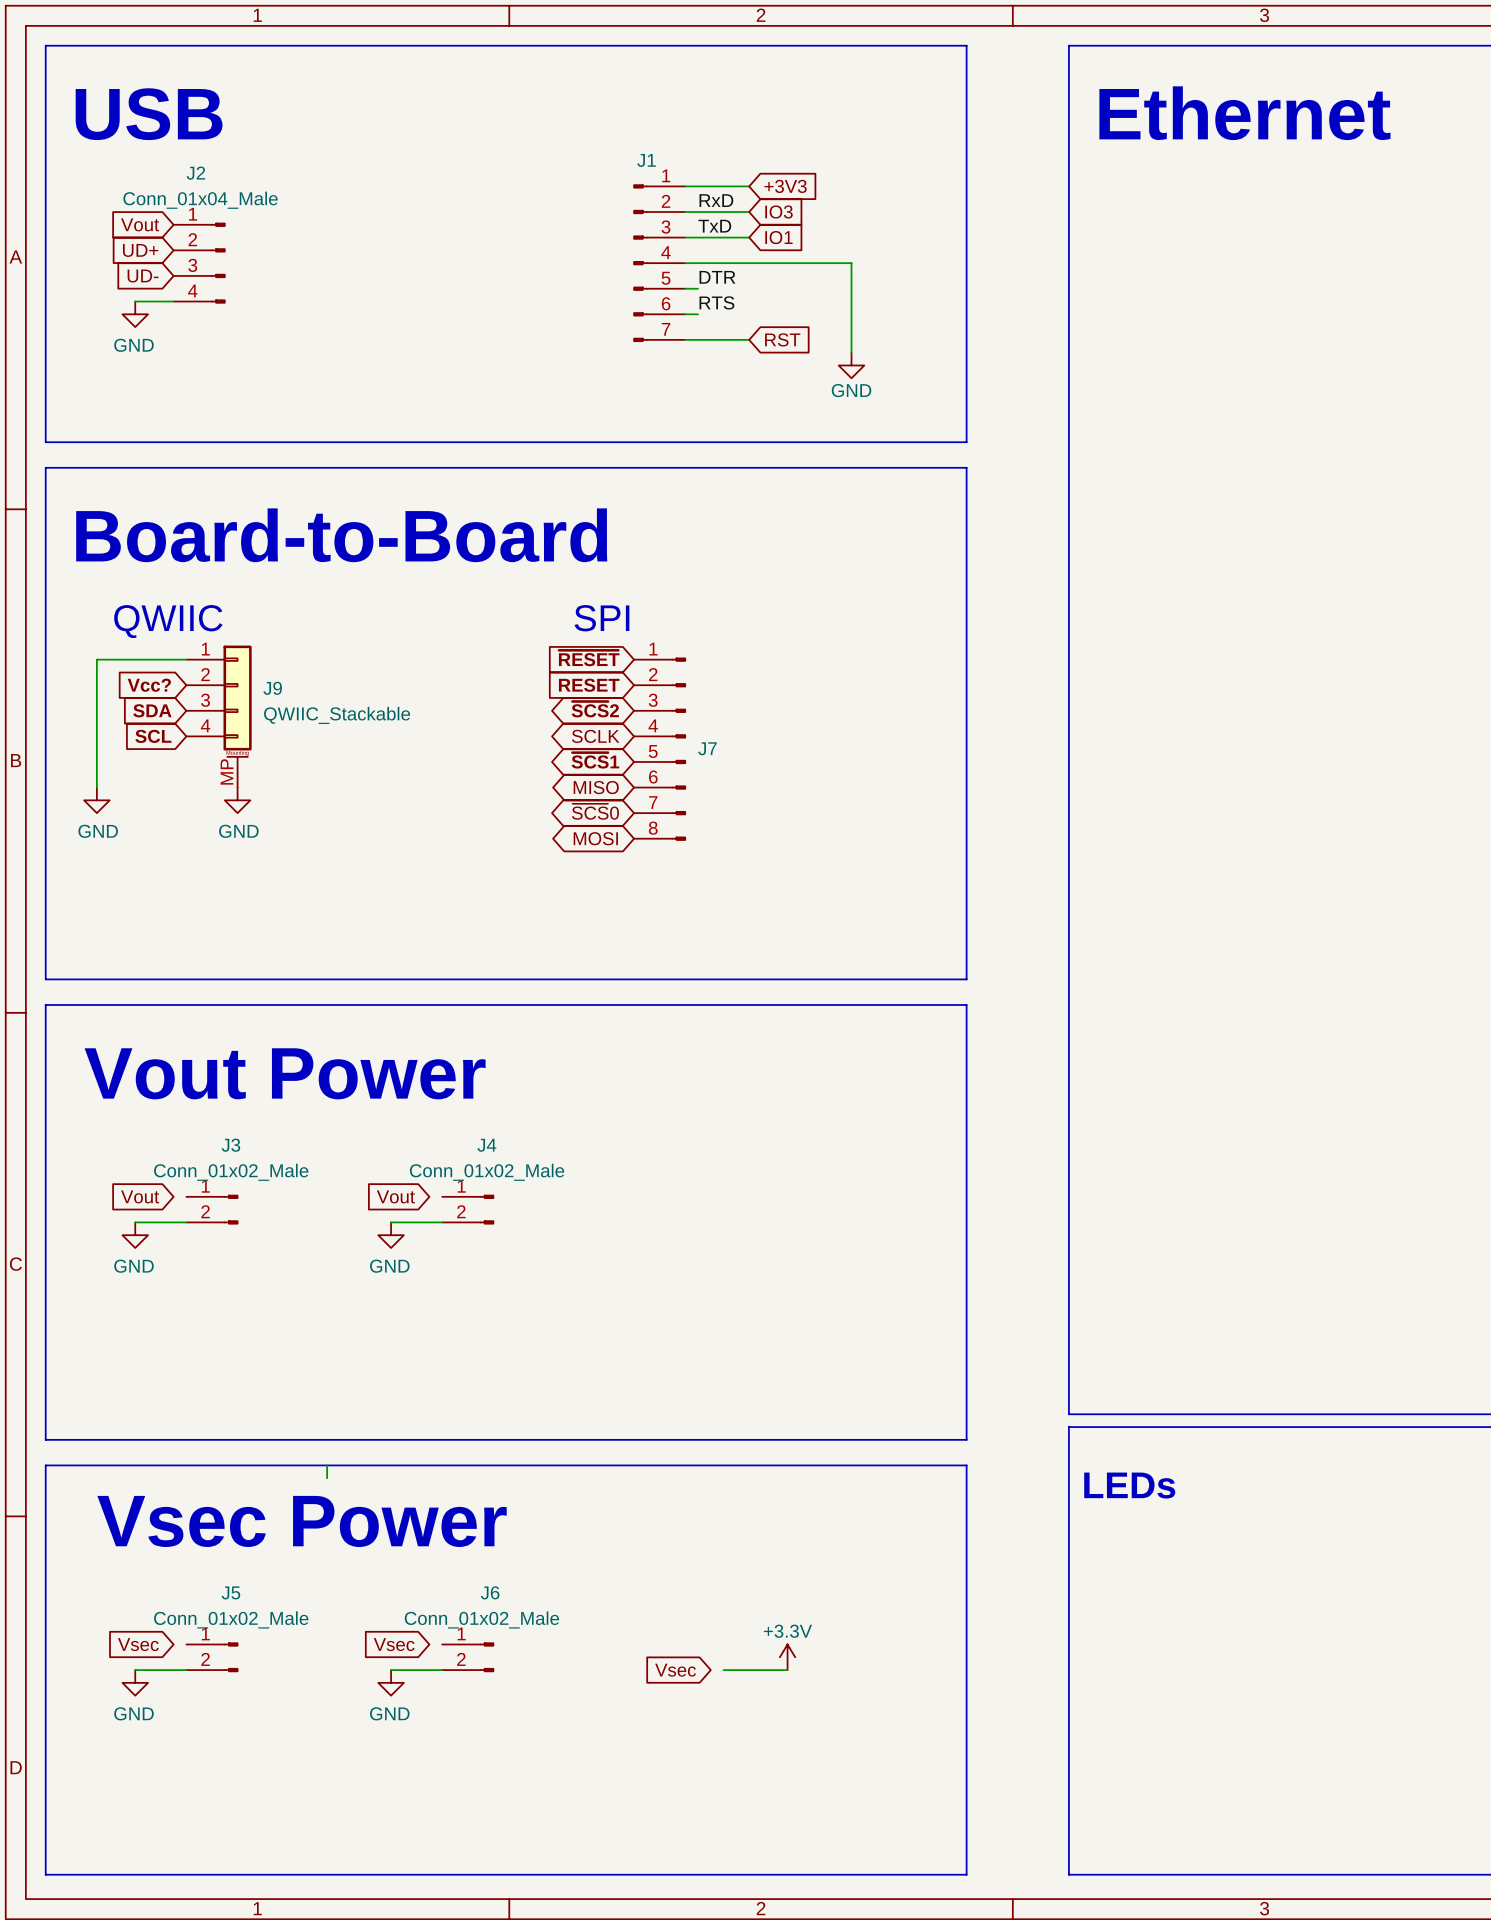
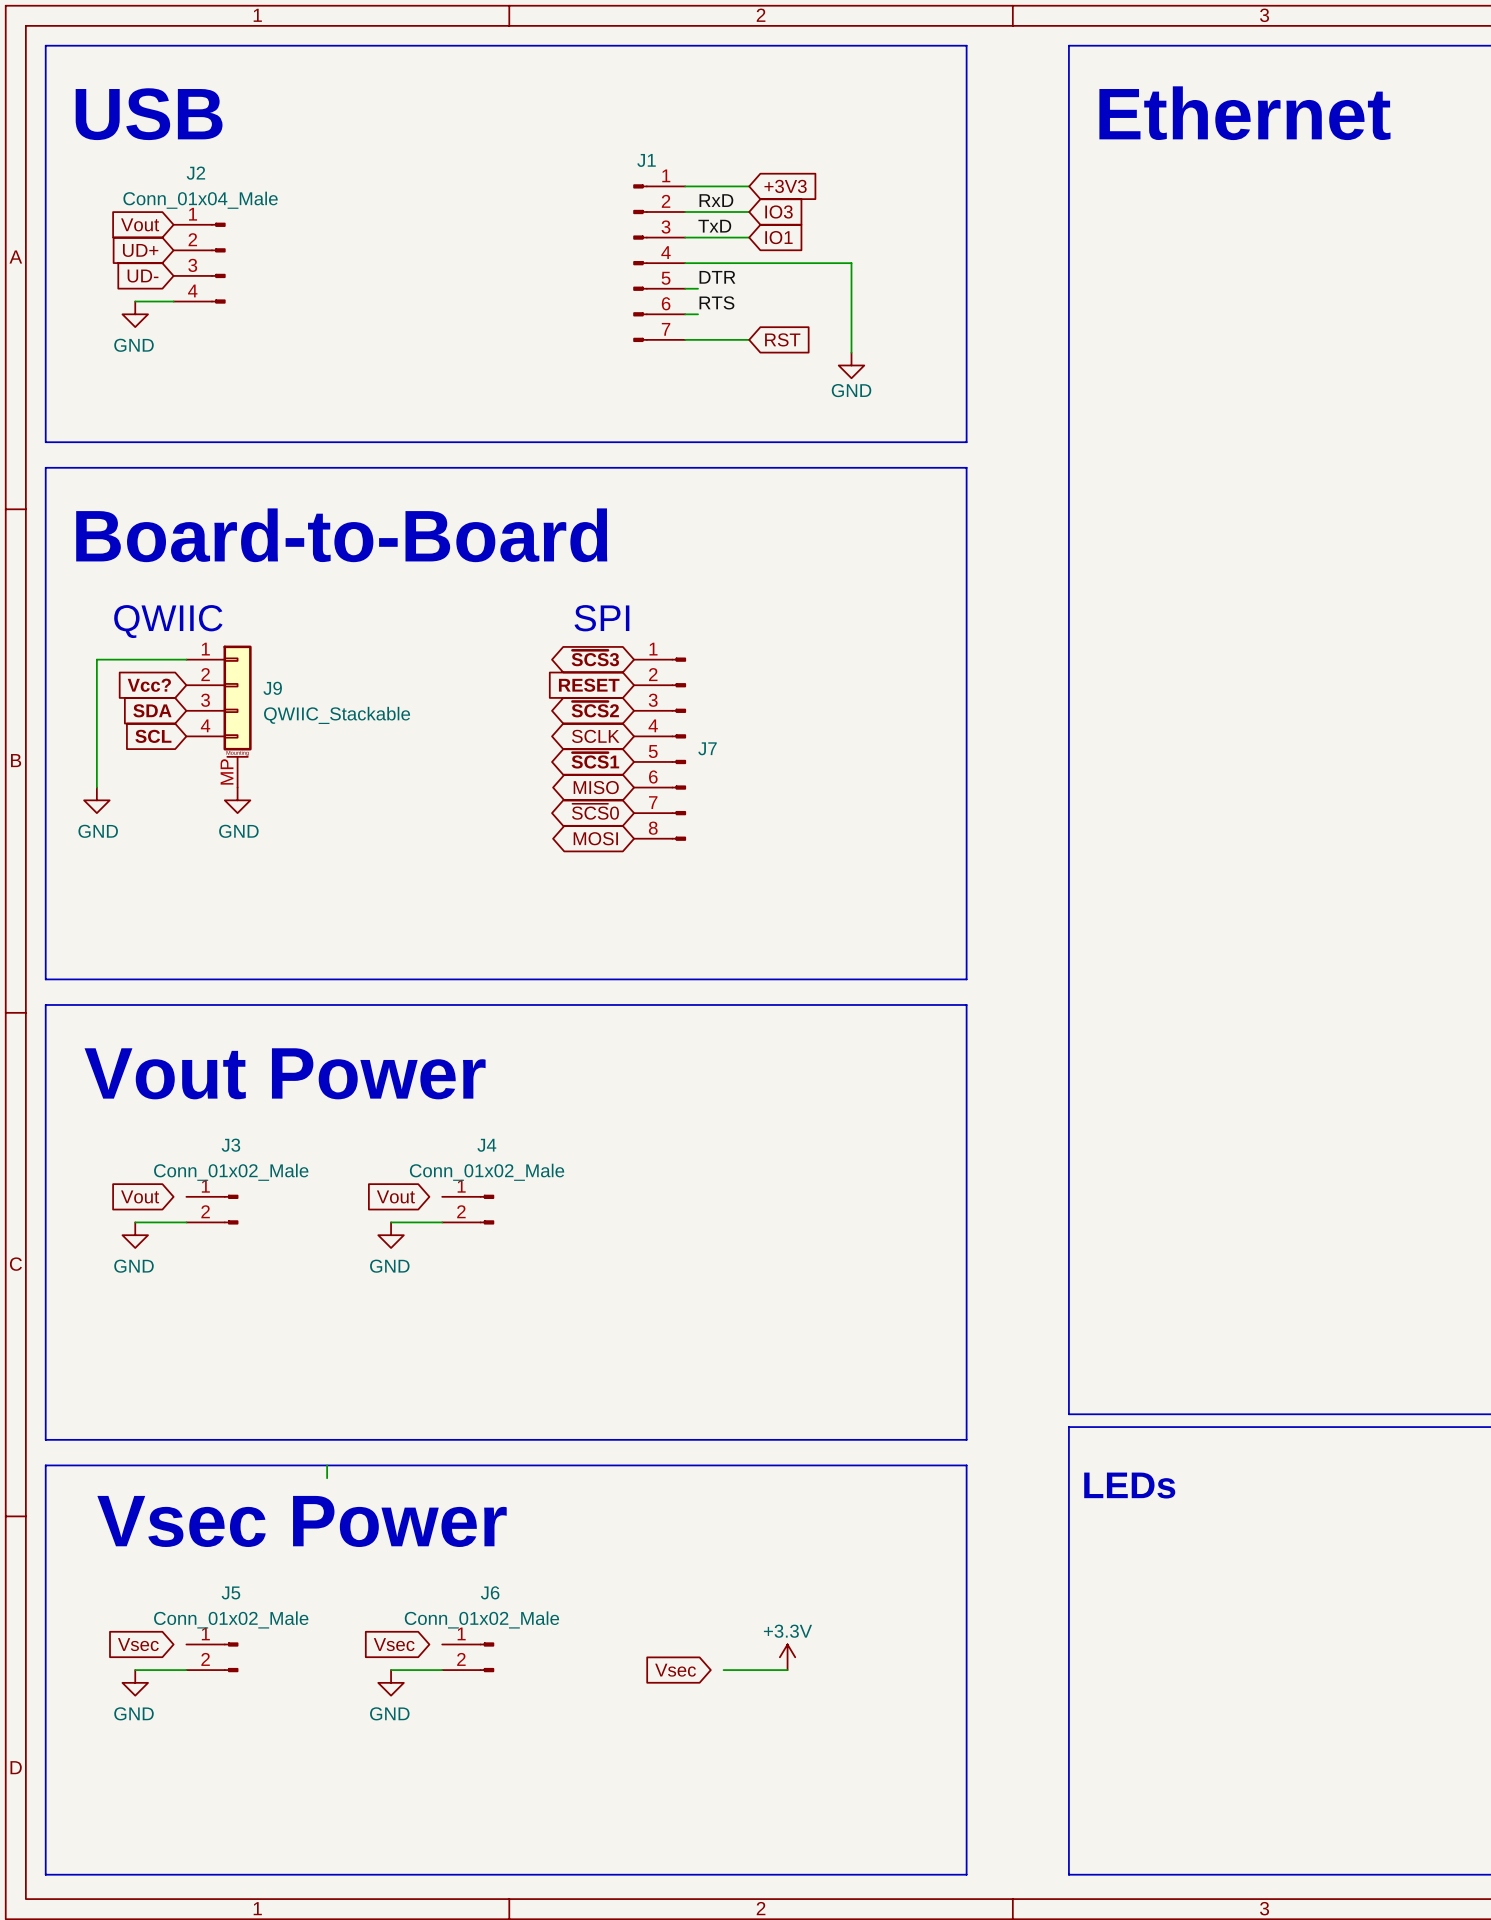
global label shape: input (589, 658) -> bidirectional (595, 658)
global label: ~{RESET} (589, 658) -> ~{SCS}3 (595, 658)

